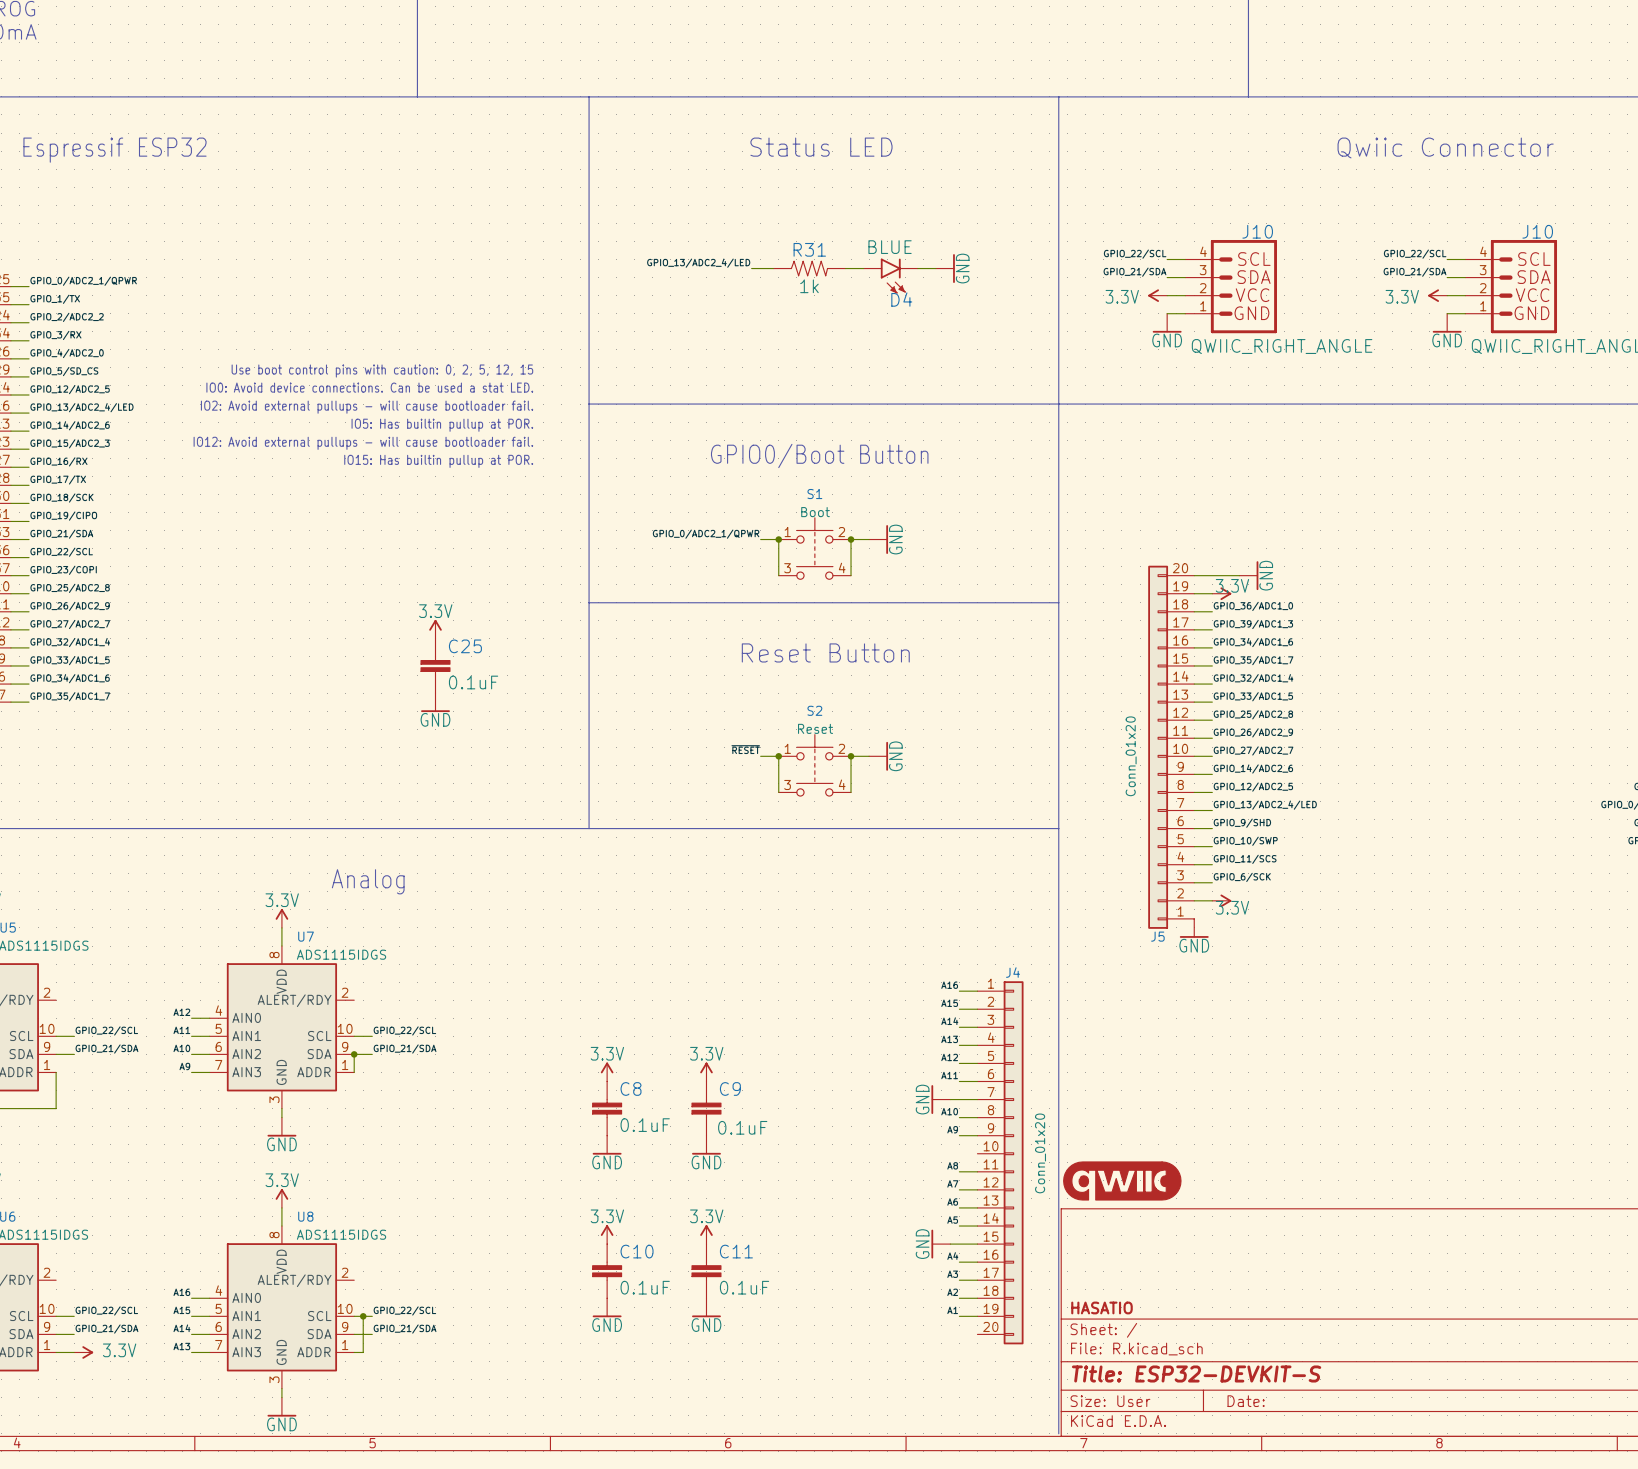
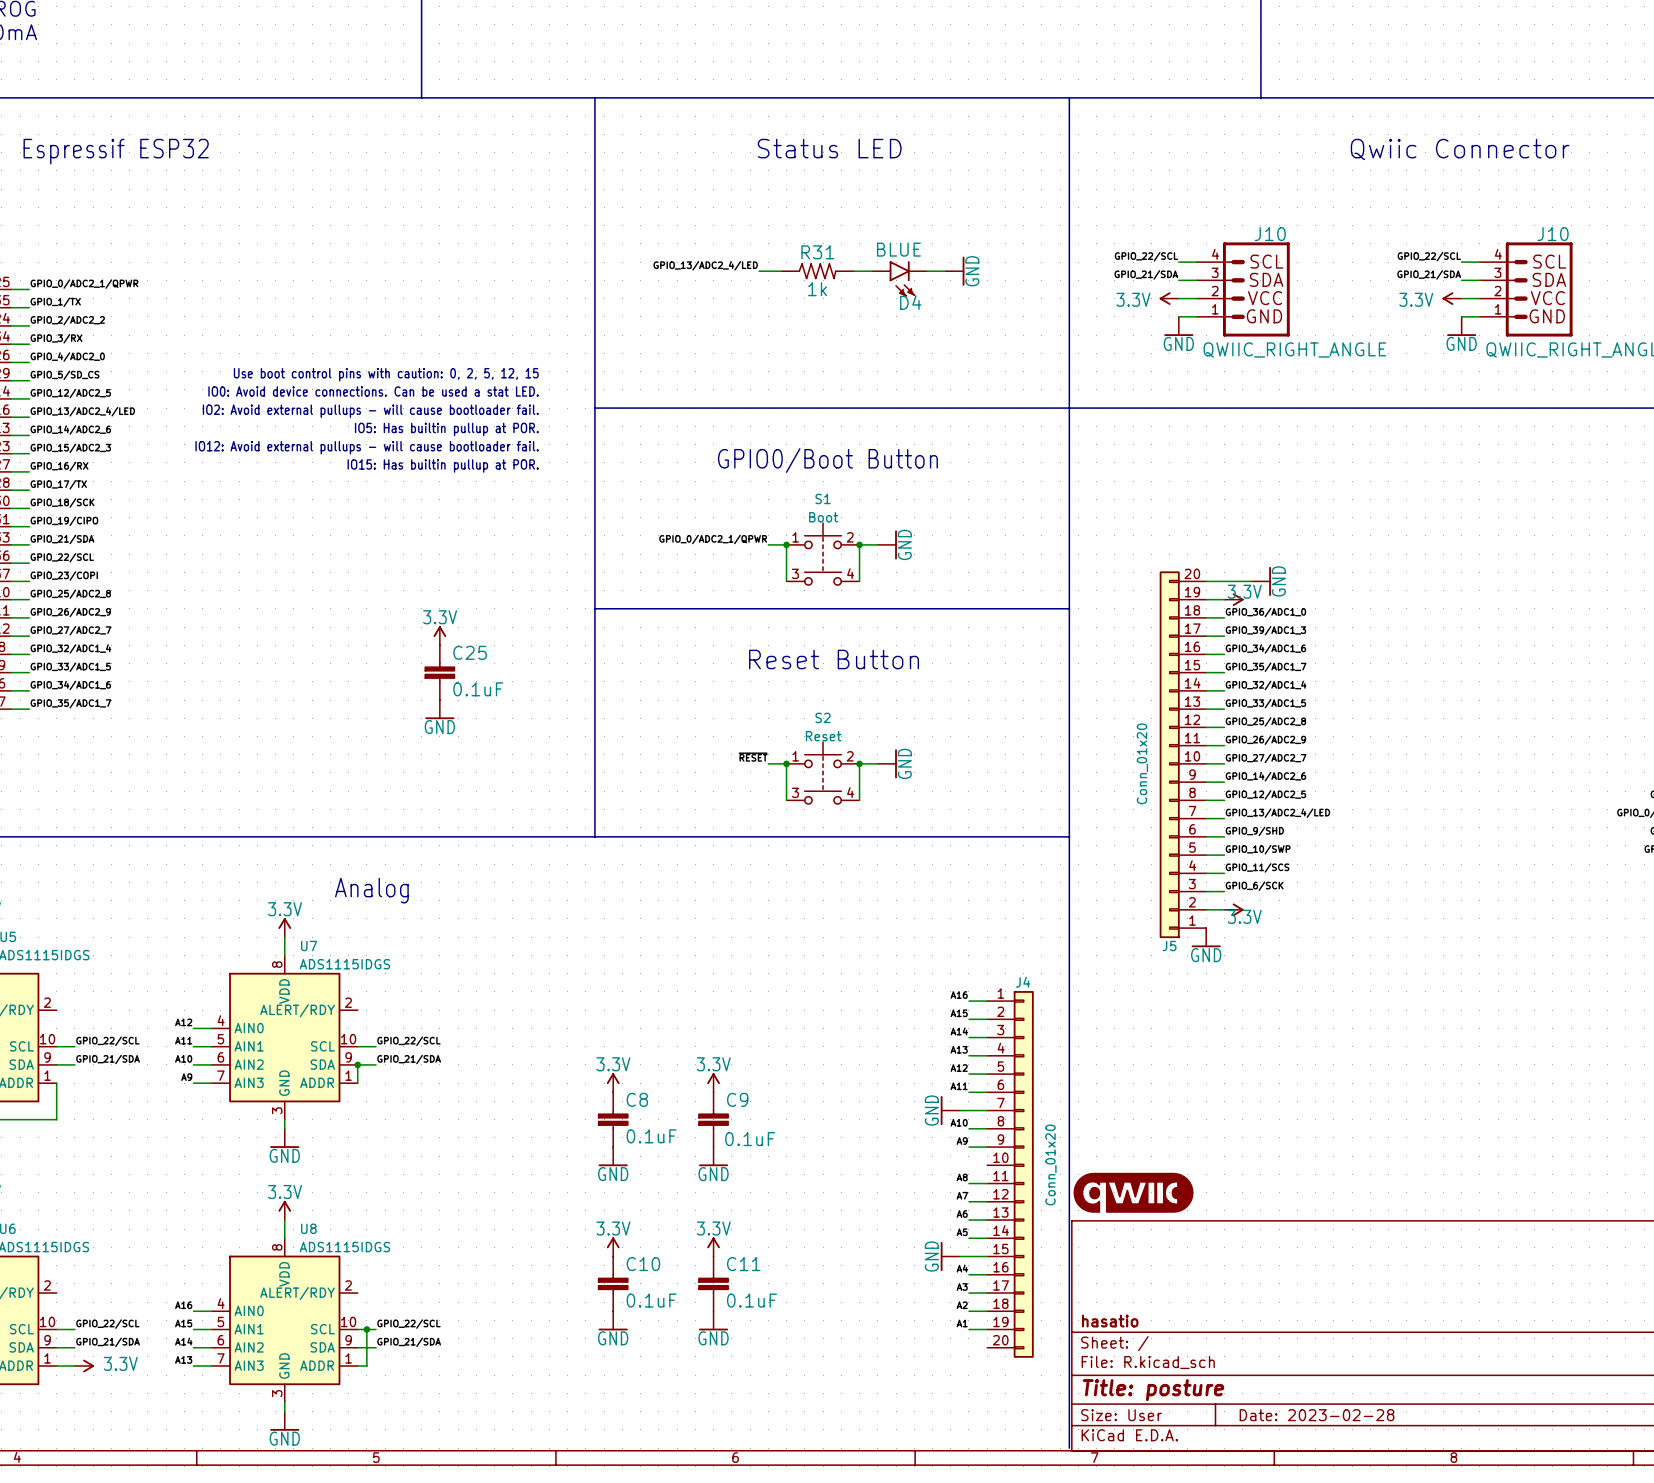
title block: HASATIO (1101, 1307) -> hasatio (1110, 1321)
title block: Title: ESP32-DEVKIT-S (1196, 1373) -> Title: posture (1153, 1390)
title block: Date: (1246, 1401) -> Date: 2023-02-28 (1317, 1415)

